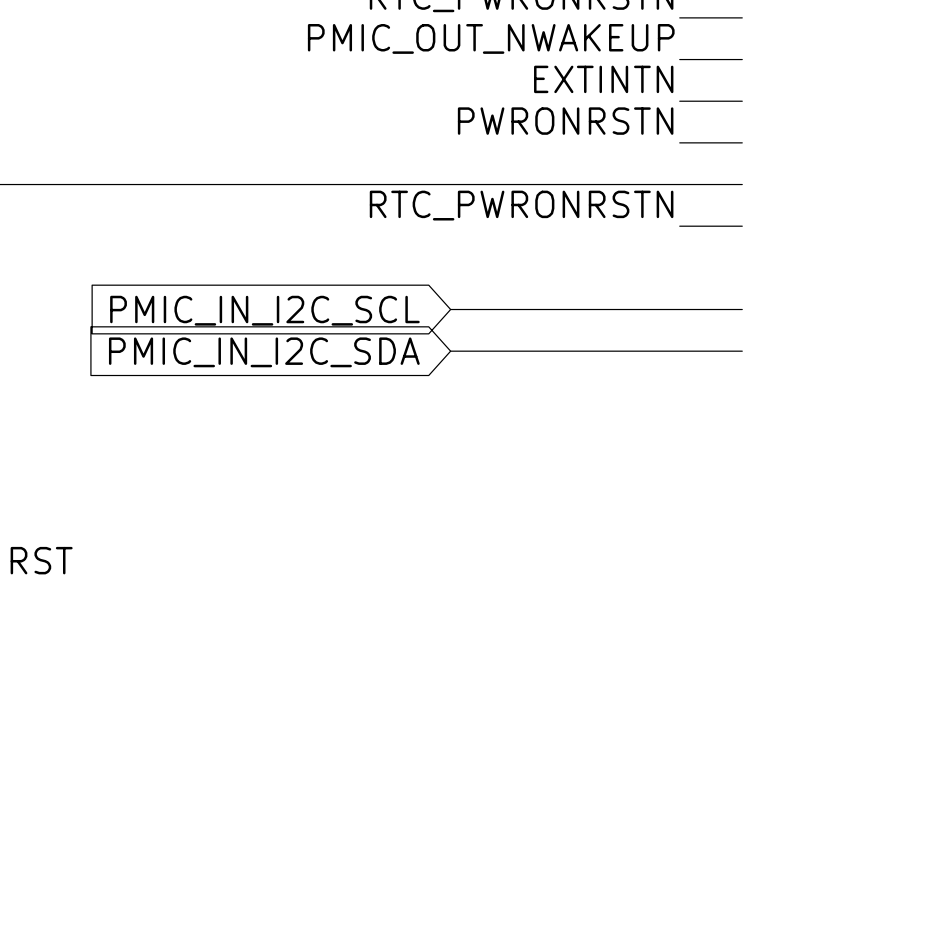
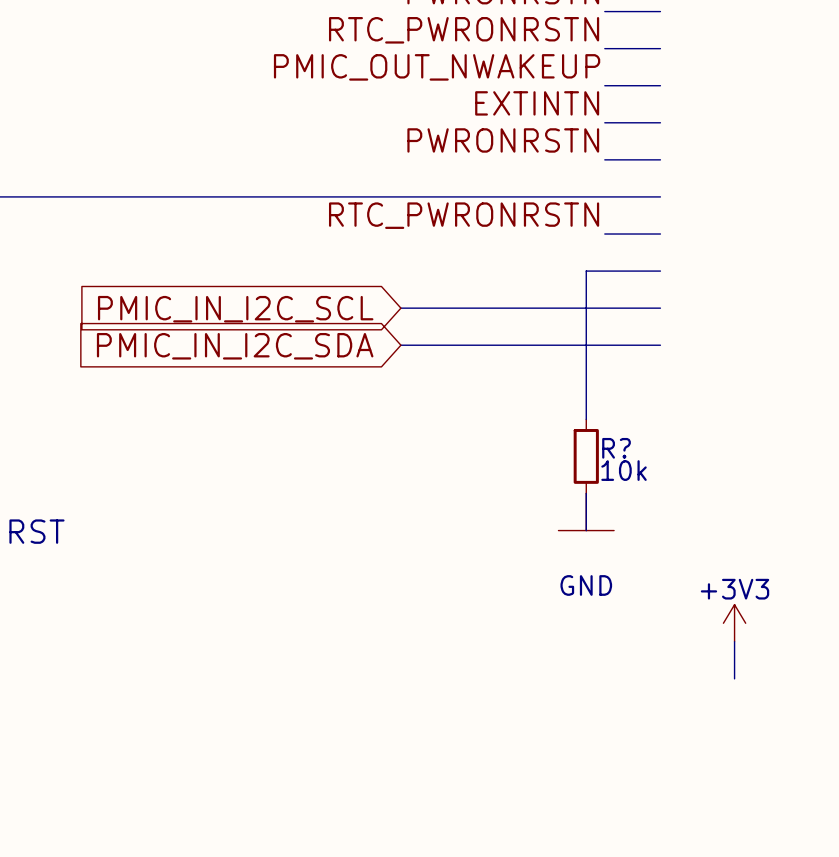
wire: none -> (660, 271) (586, 271) (586, 419)
R?: none -> 10k (586, 456)
wire: none -> (586, 493) (586, 530)
power symbol: none -> GND (586, 512)
power symbol: none -> +3V3 (734, 623)
wire: none -> (734, 641) (734, 678)

